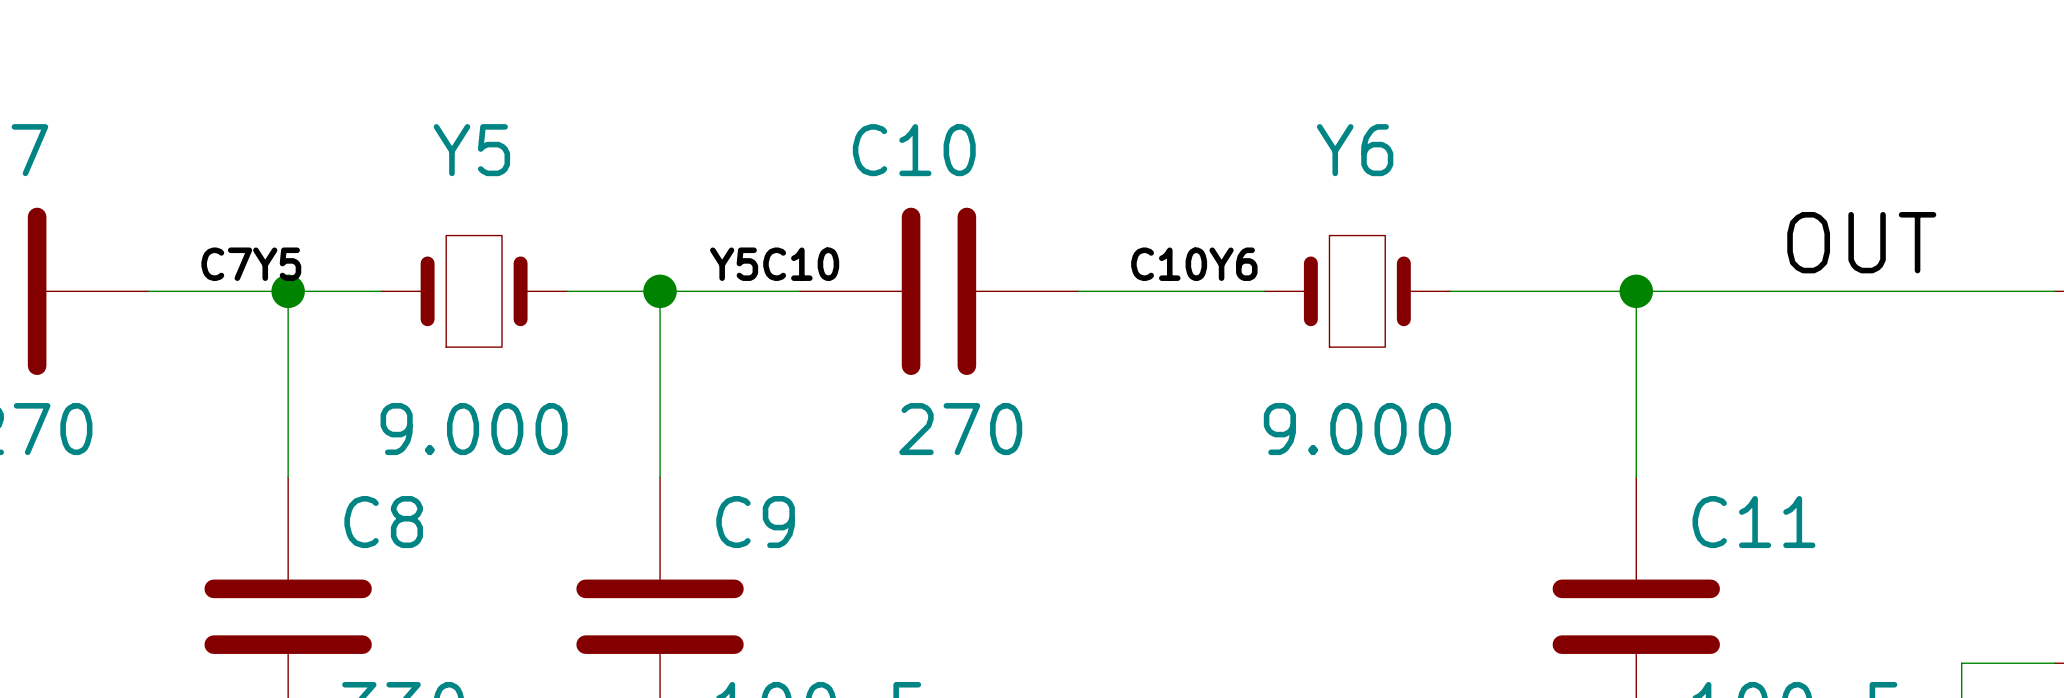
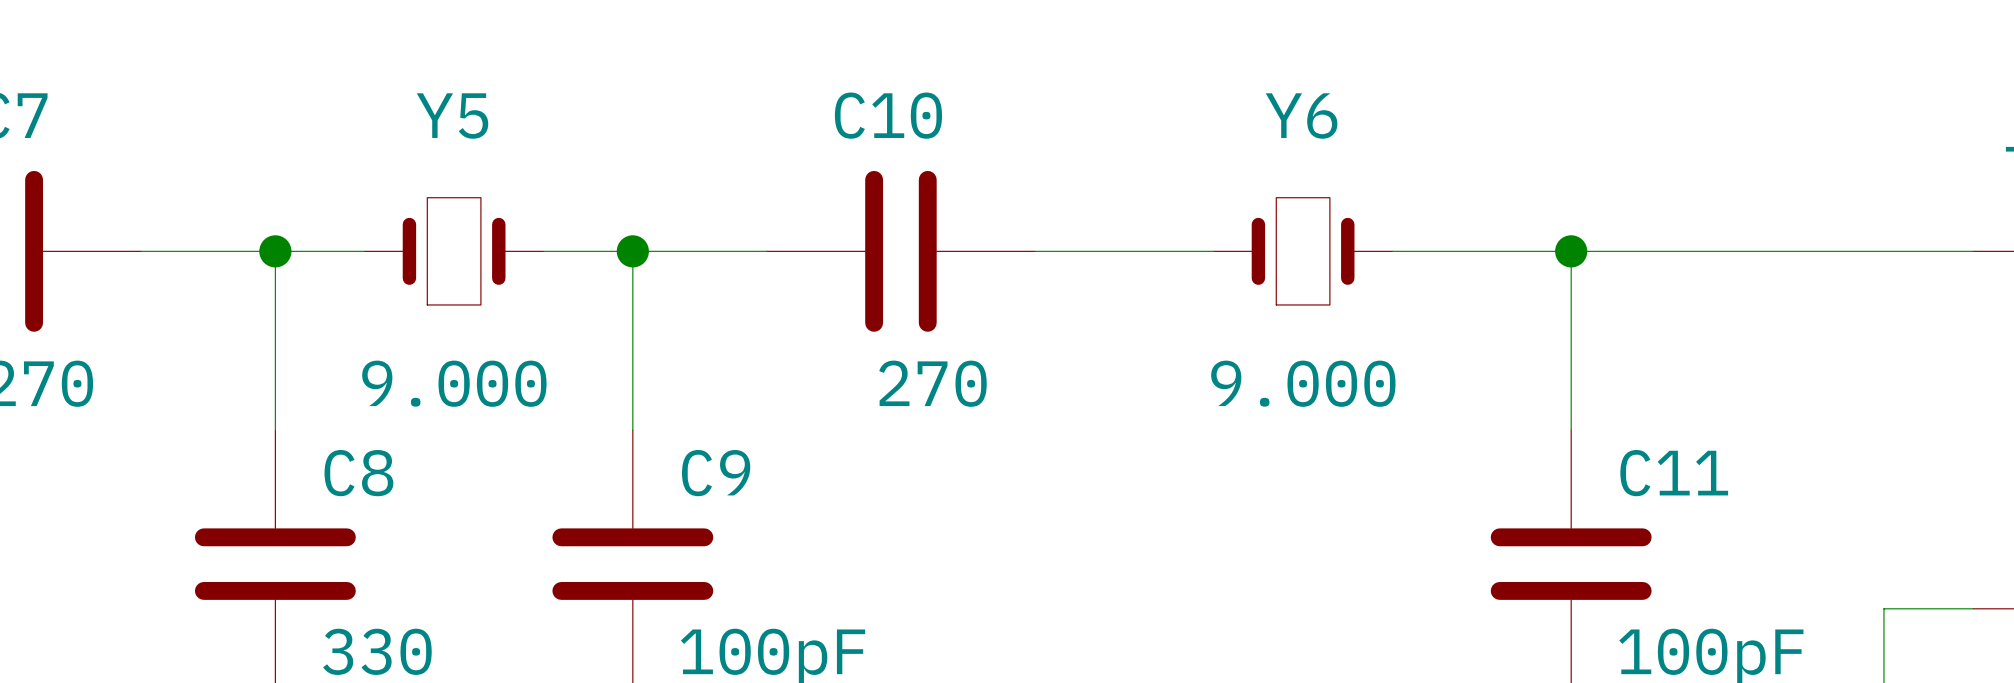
label: OUT (1861, 242) -> none
label: C7Y5 (251, 264) -> none
label: Y5C10 (774, 264) -> none
label: C10Y6 (1194, 264) -> none

